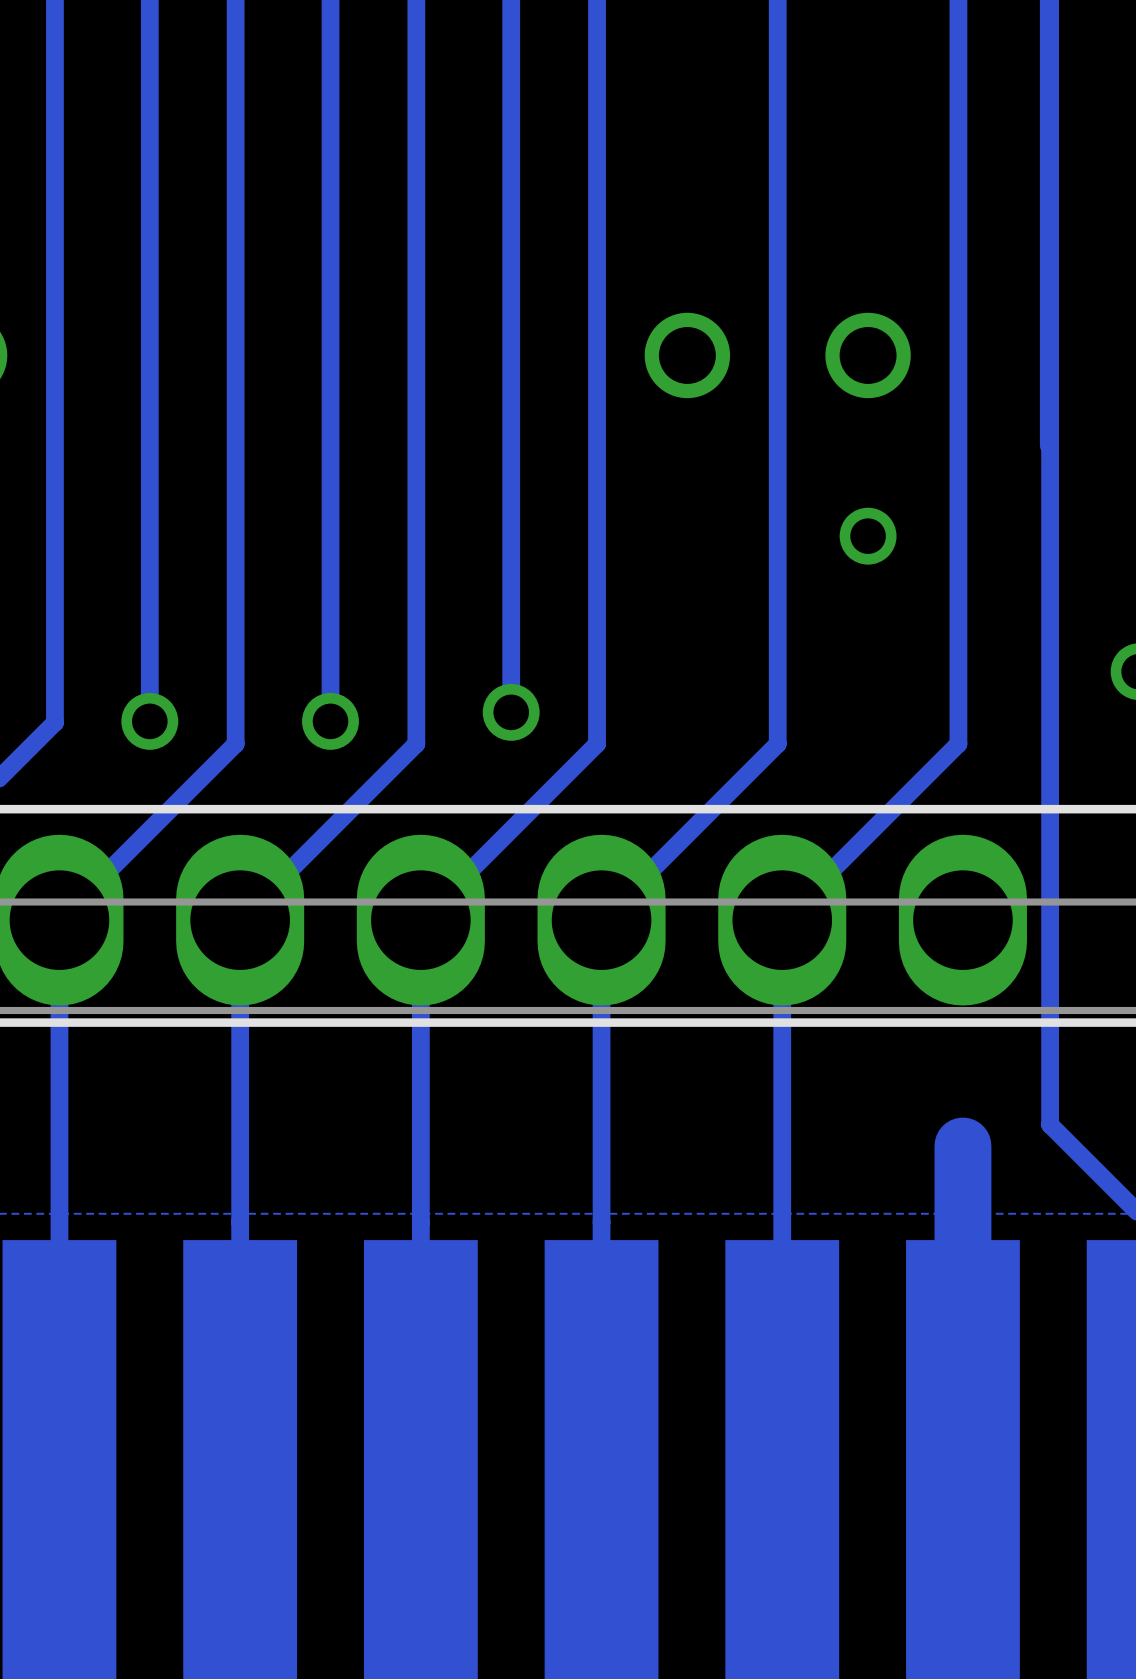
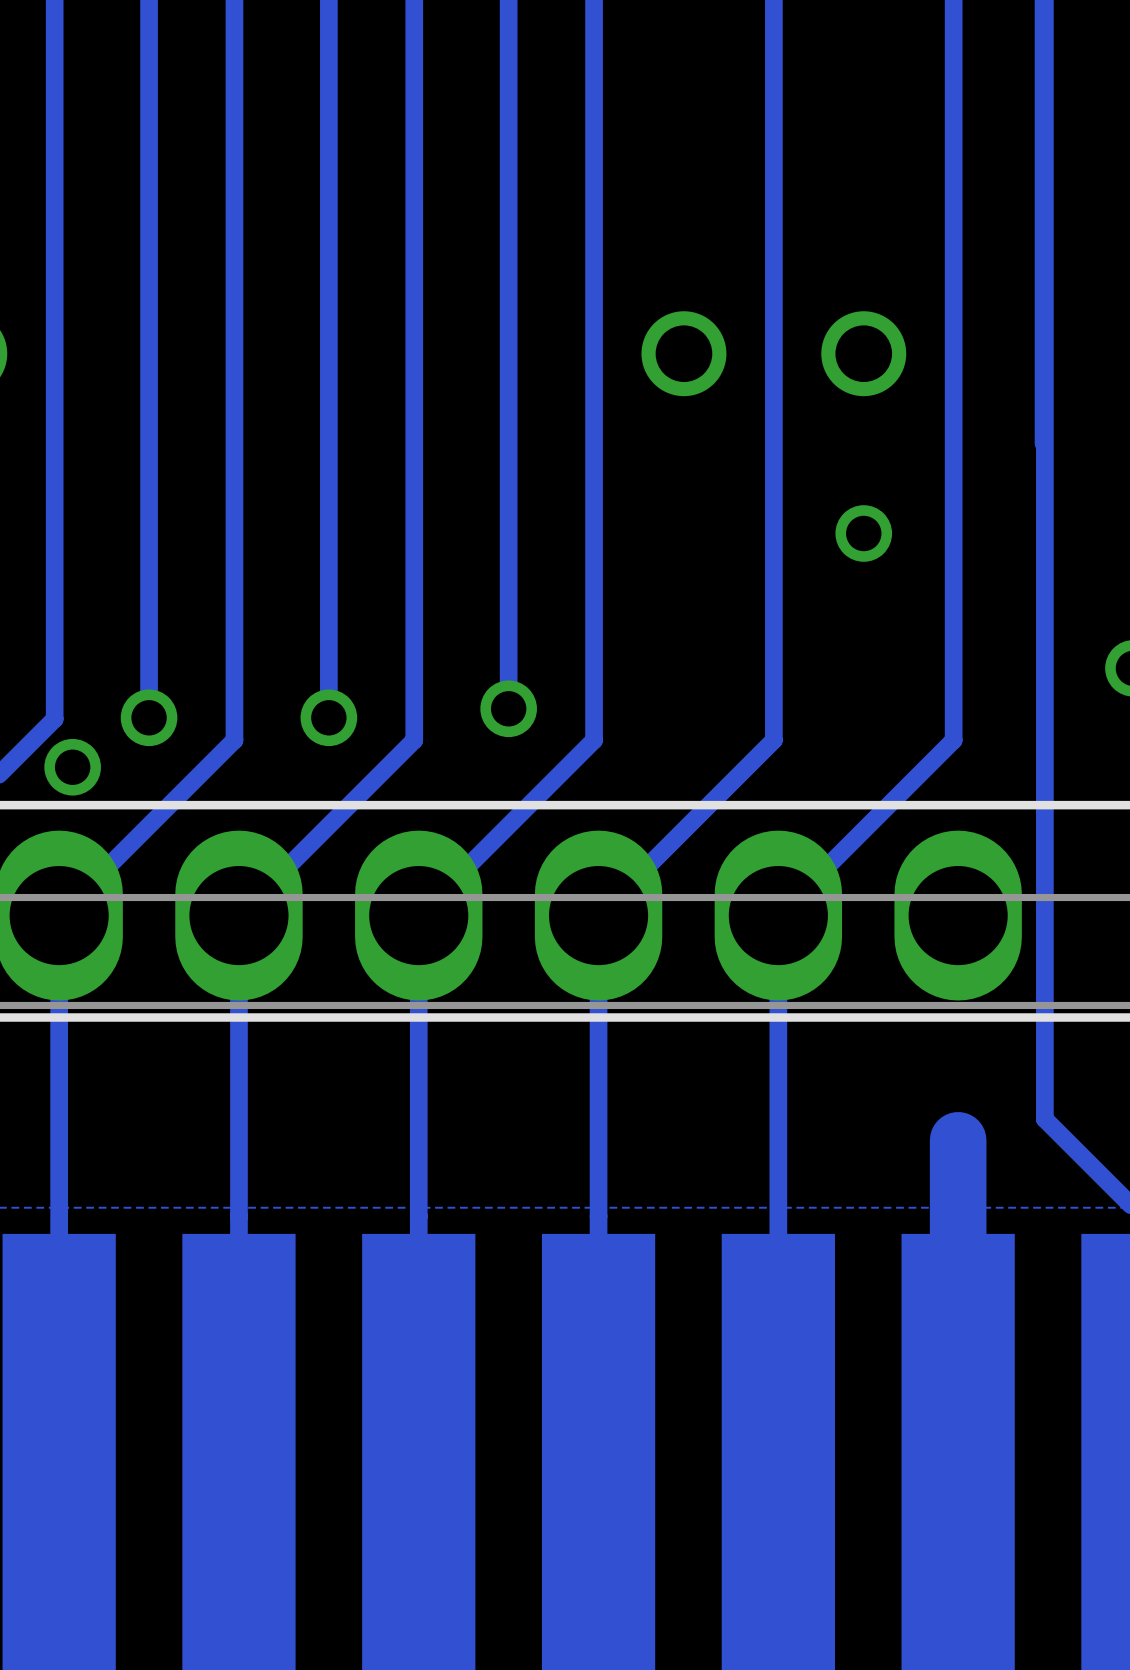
via: none -> (72, 767)

